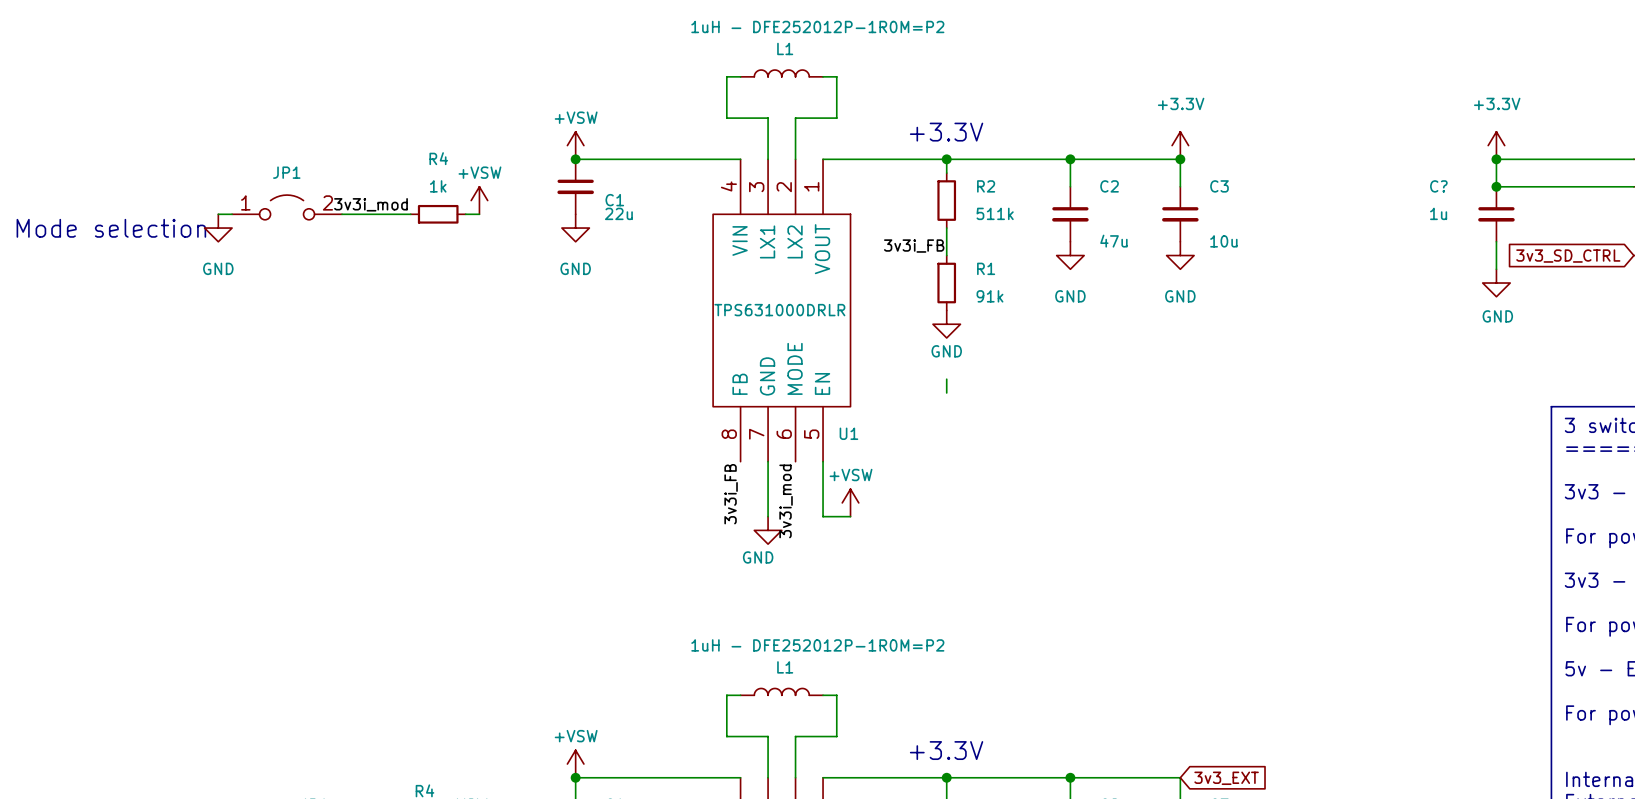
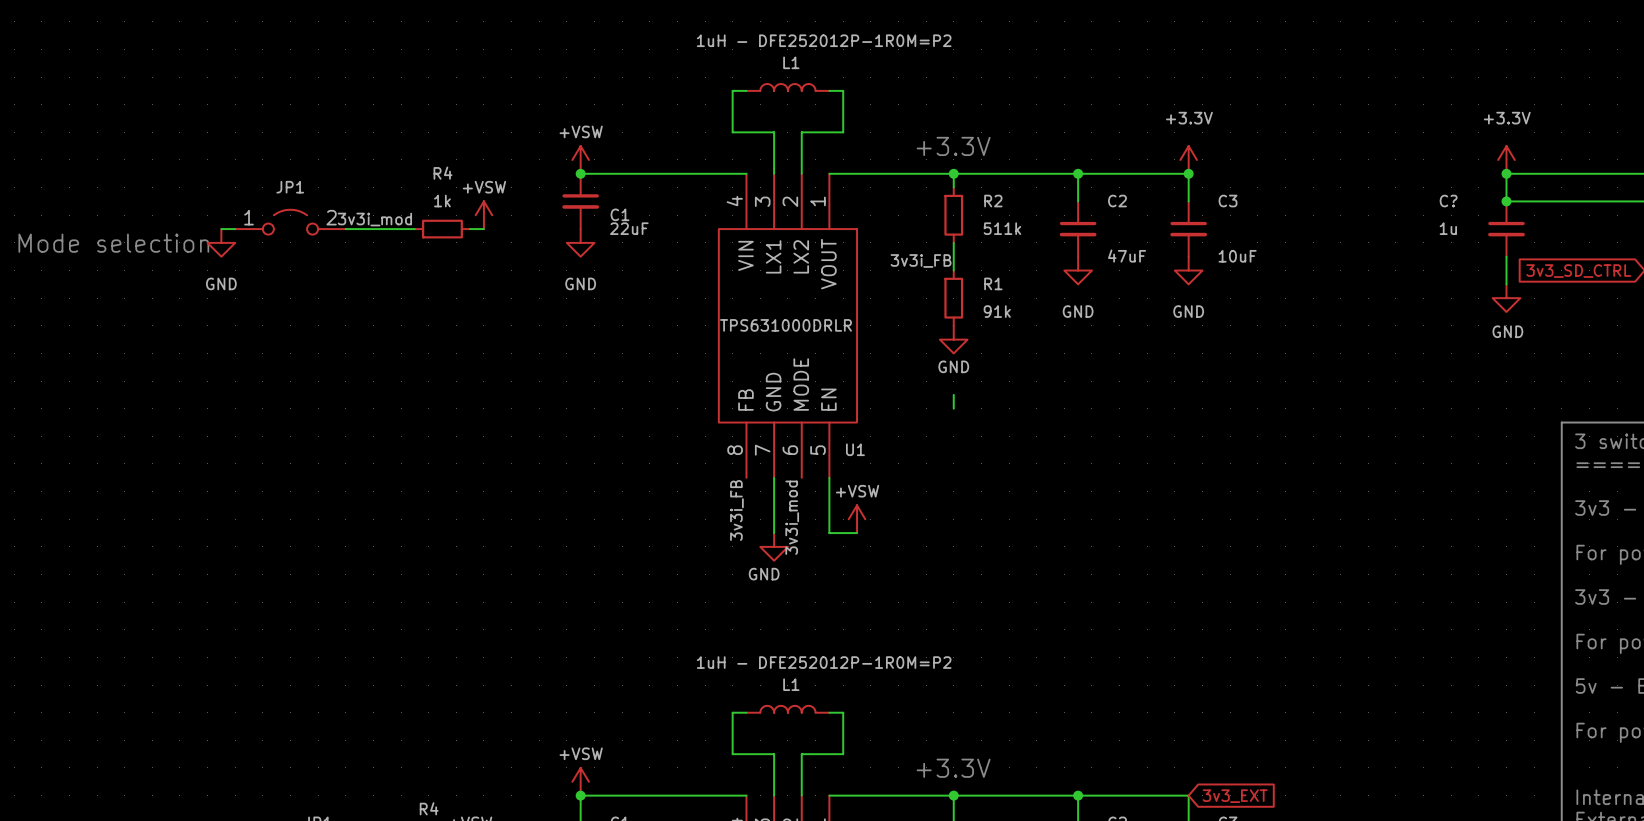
C1 value: 22u (618, 213) -> 22uF (629, 228)
C2 value: 47u (1113, 241) -> 47uF (1127, 256)
C3 value: 10u (1223, 241) -> 10uF (1237, 256)

